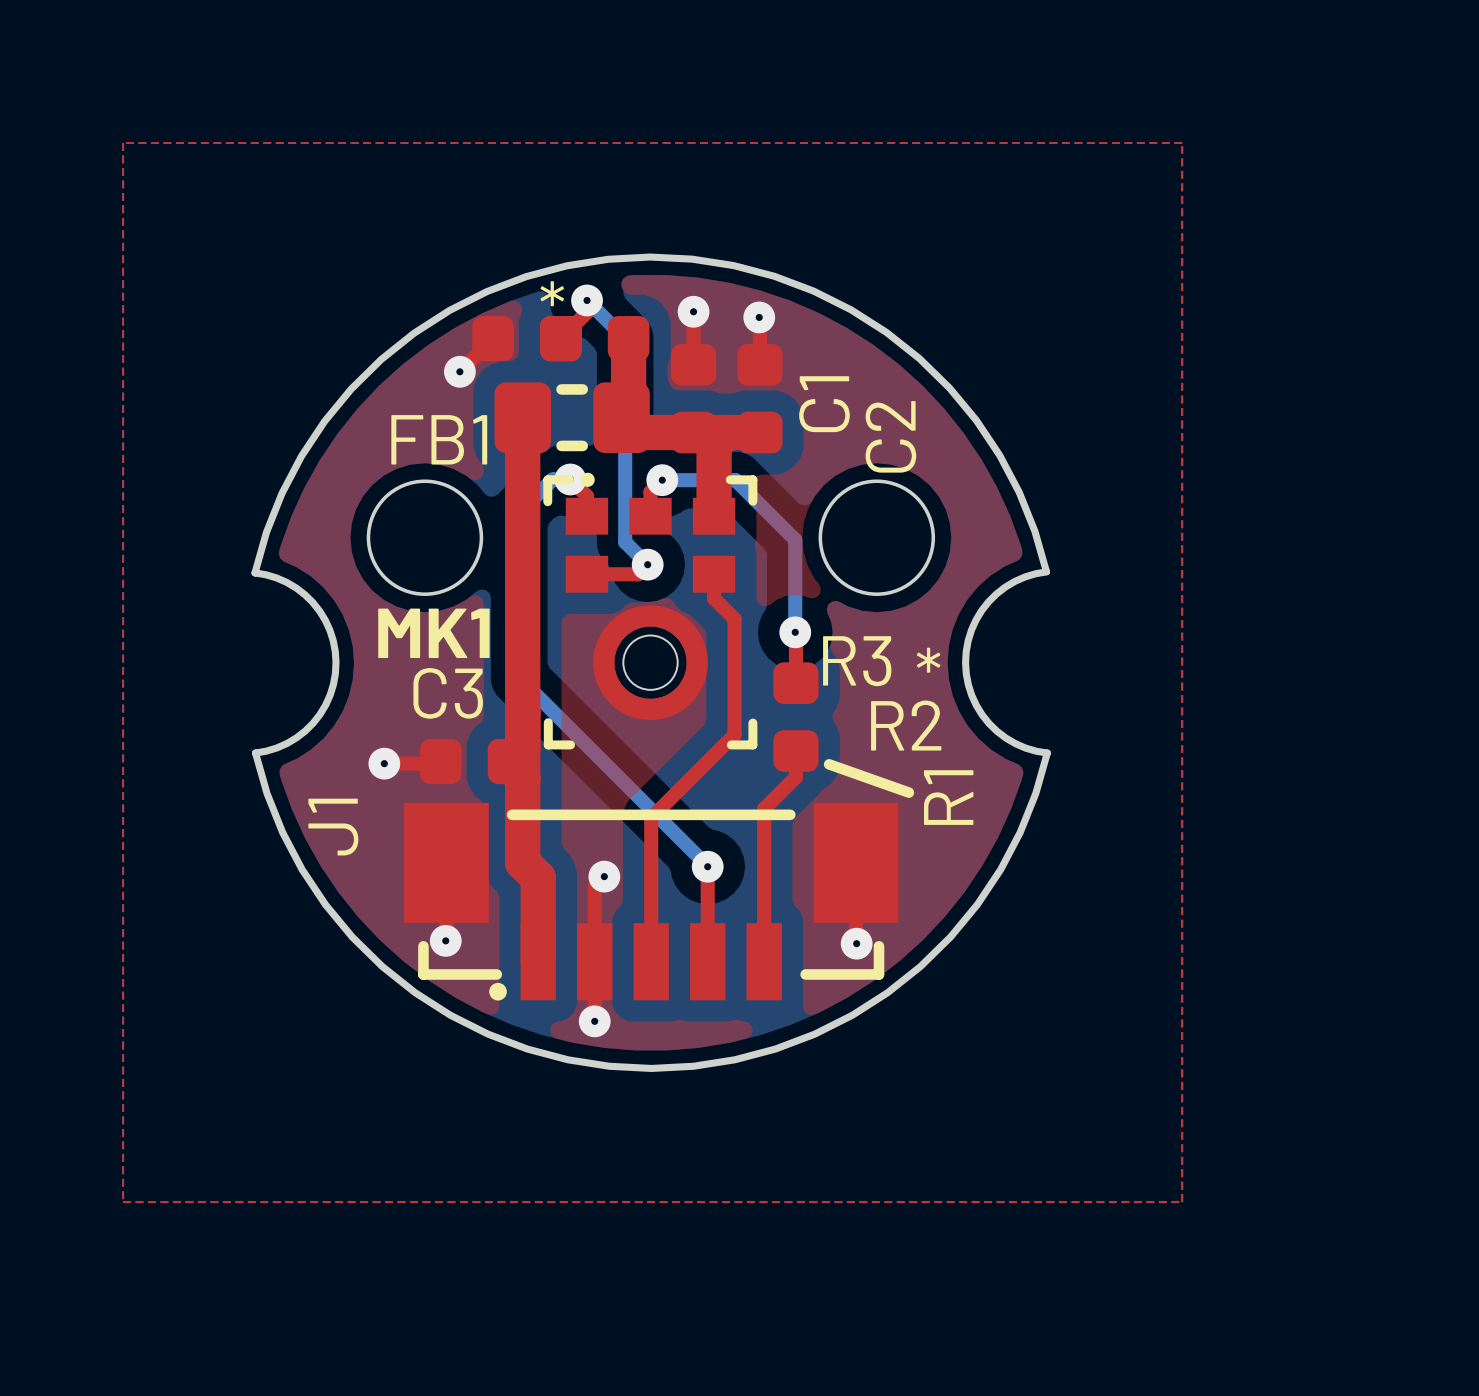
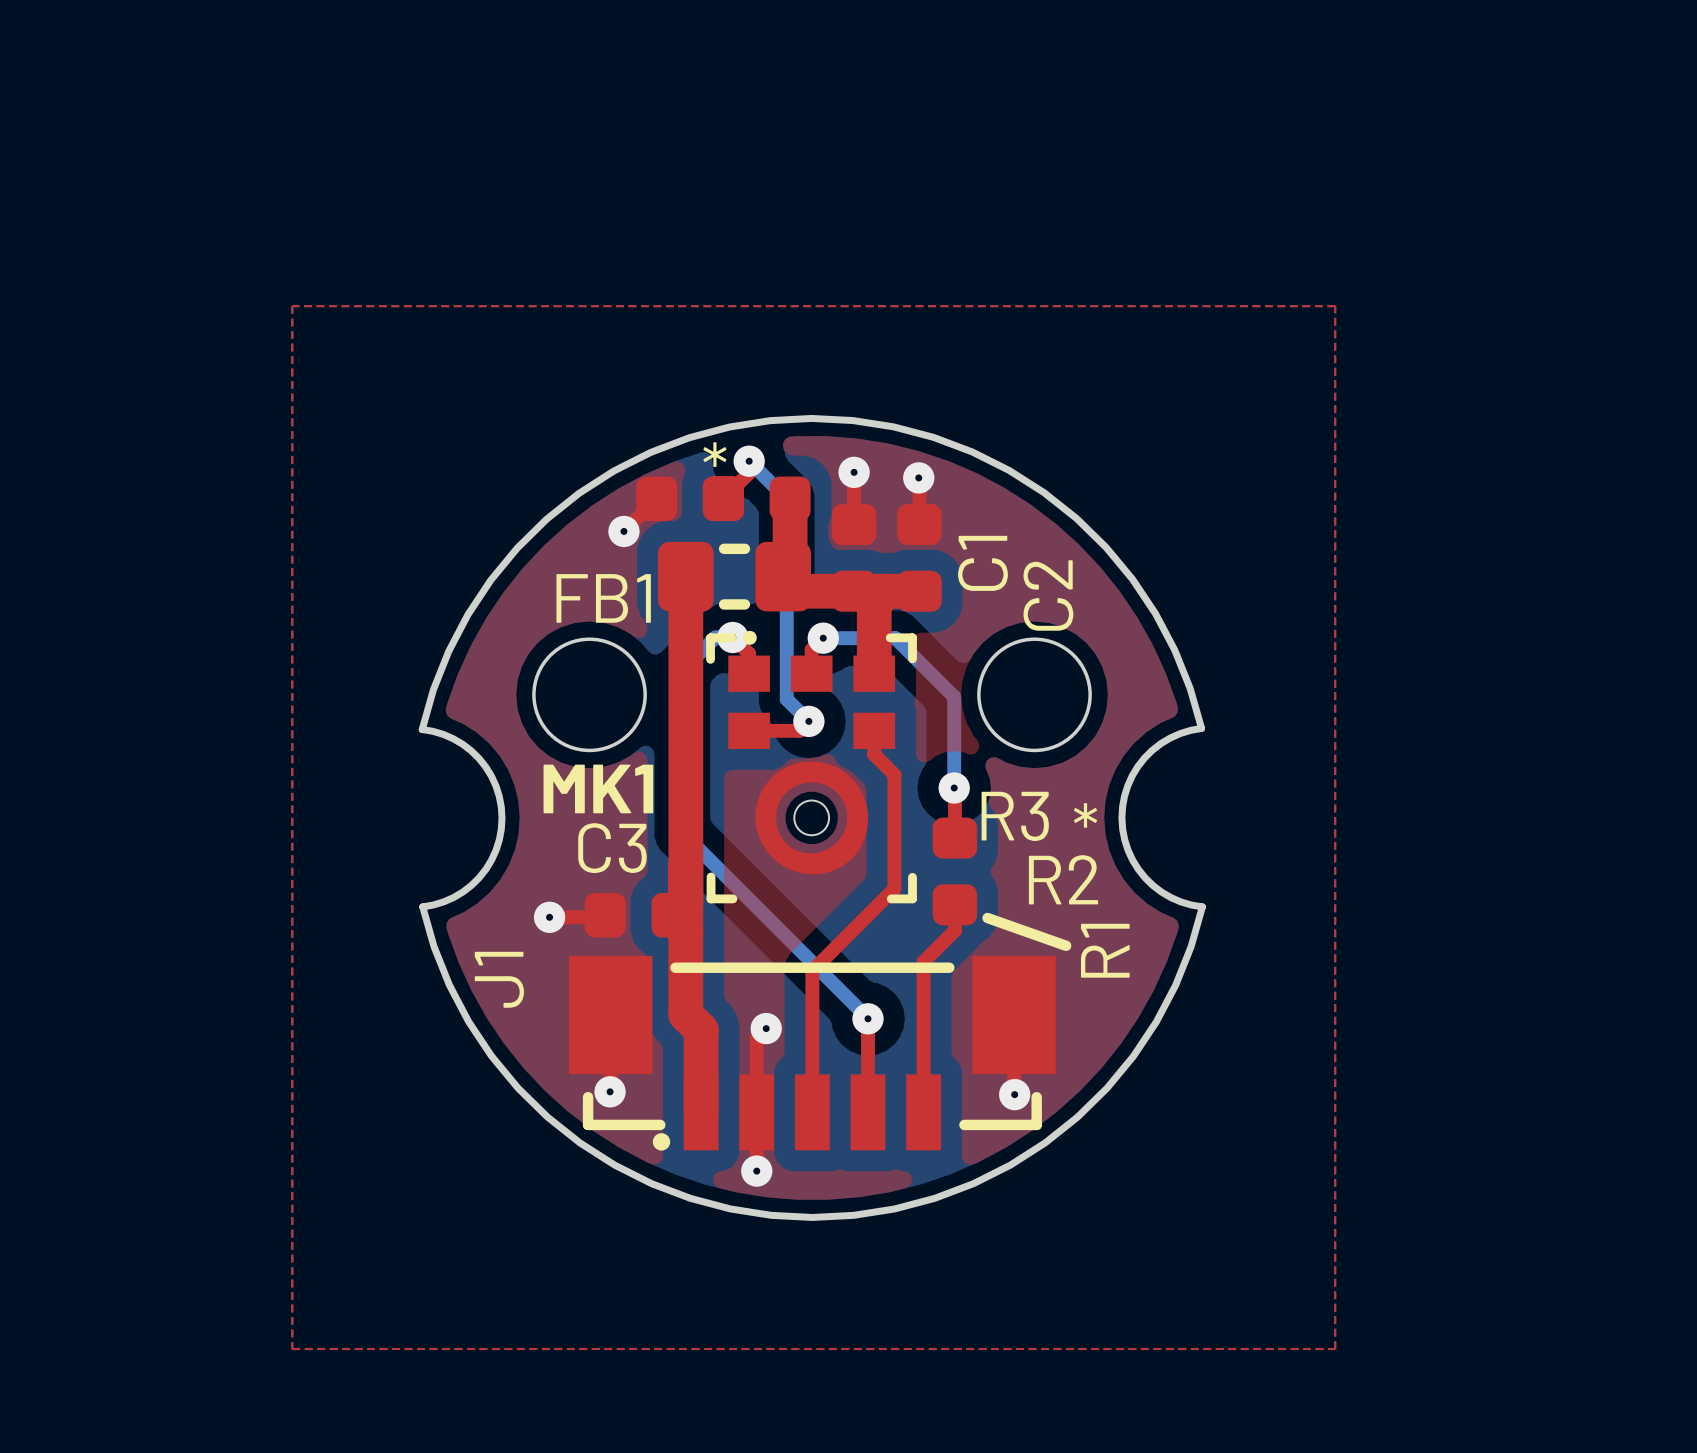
MK1 footprint: [543, 472, 758, 750] -> [706, 630, 917, 904]

